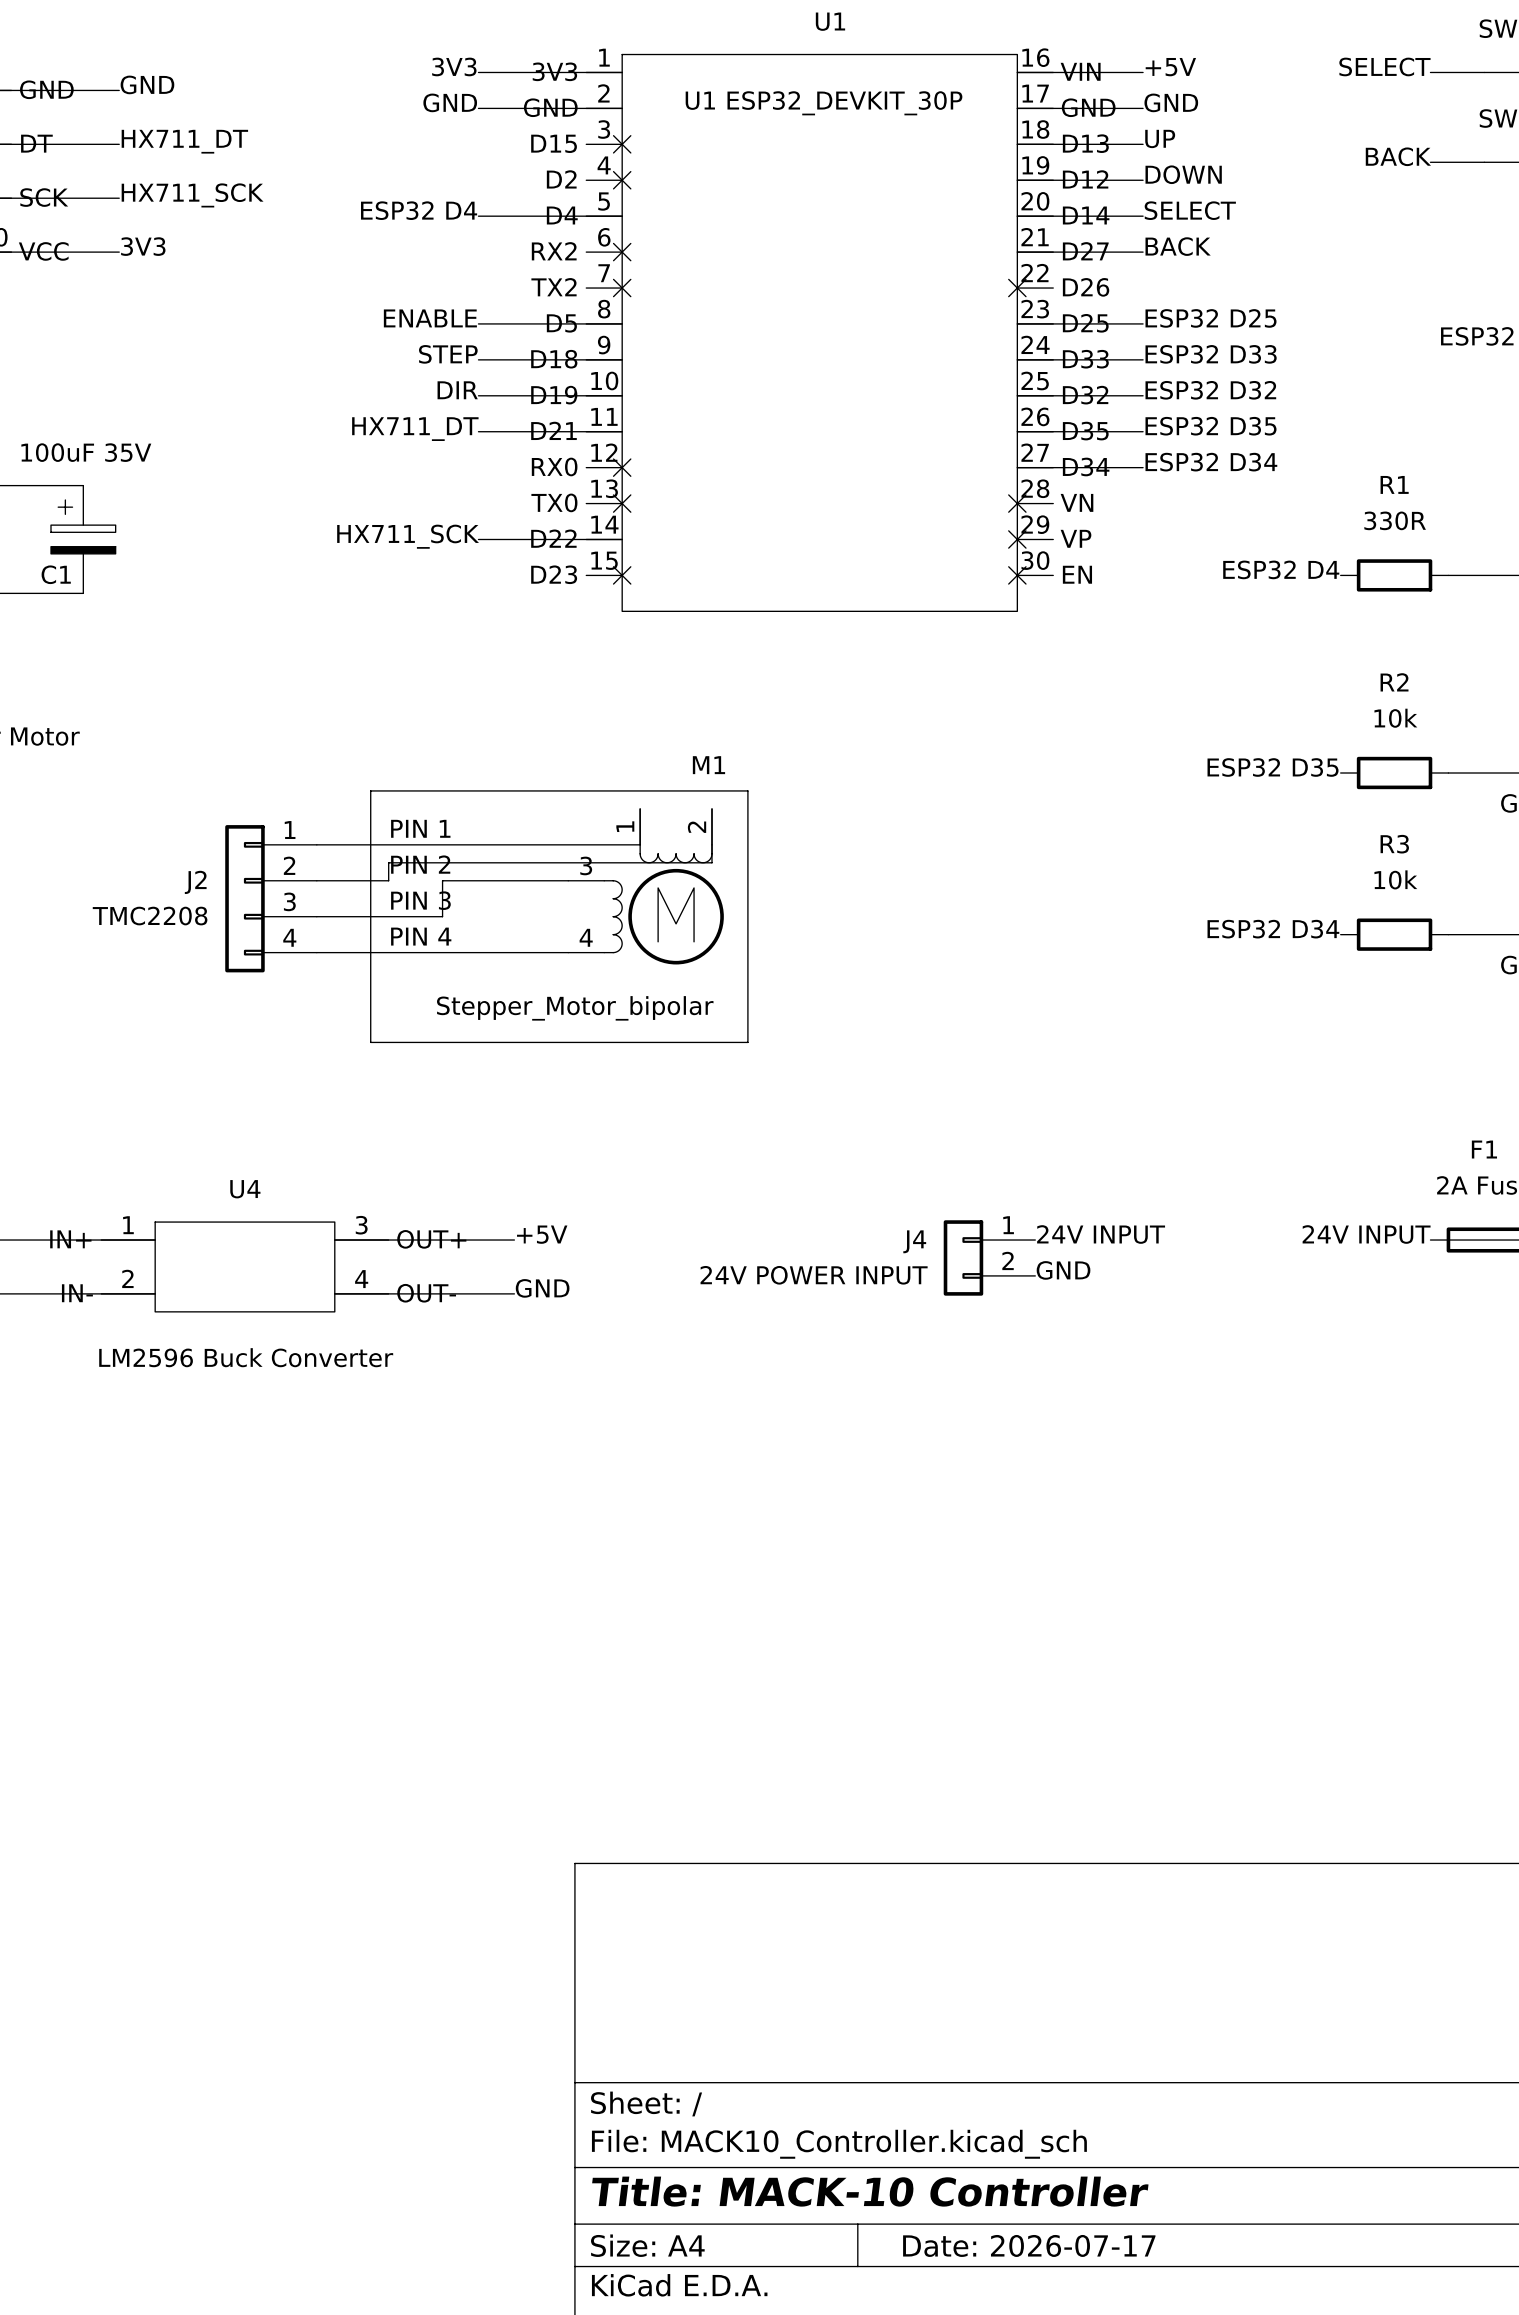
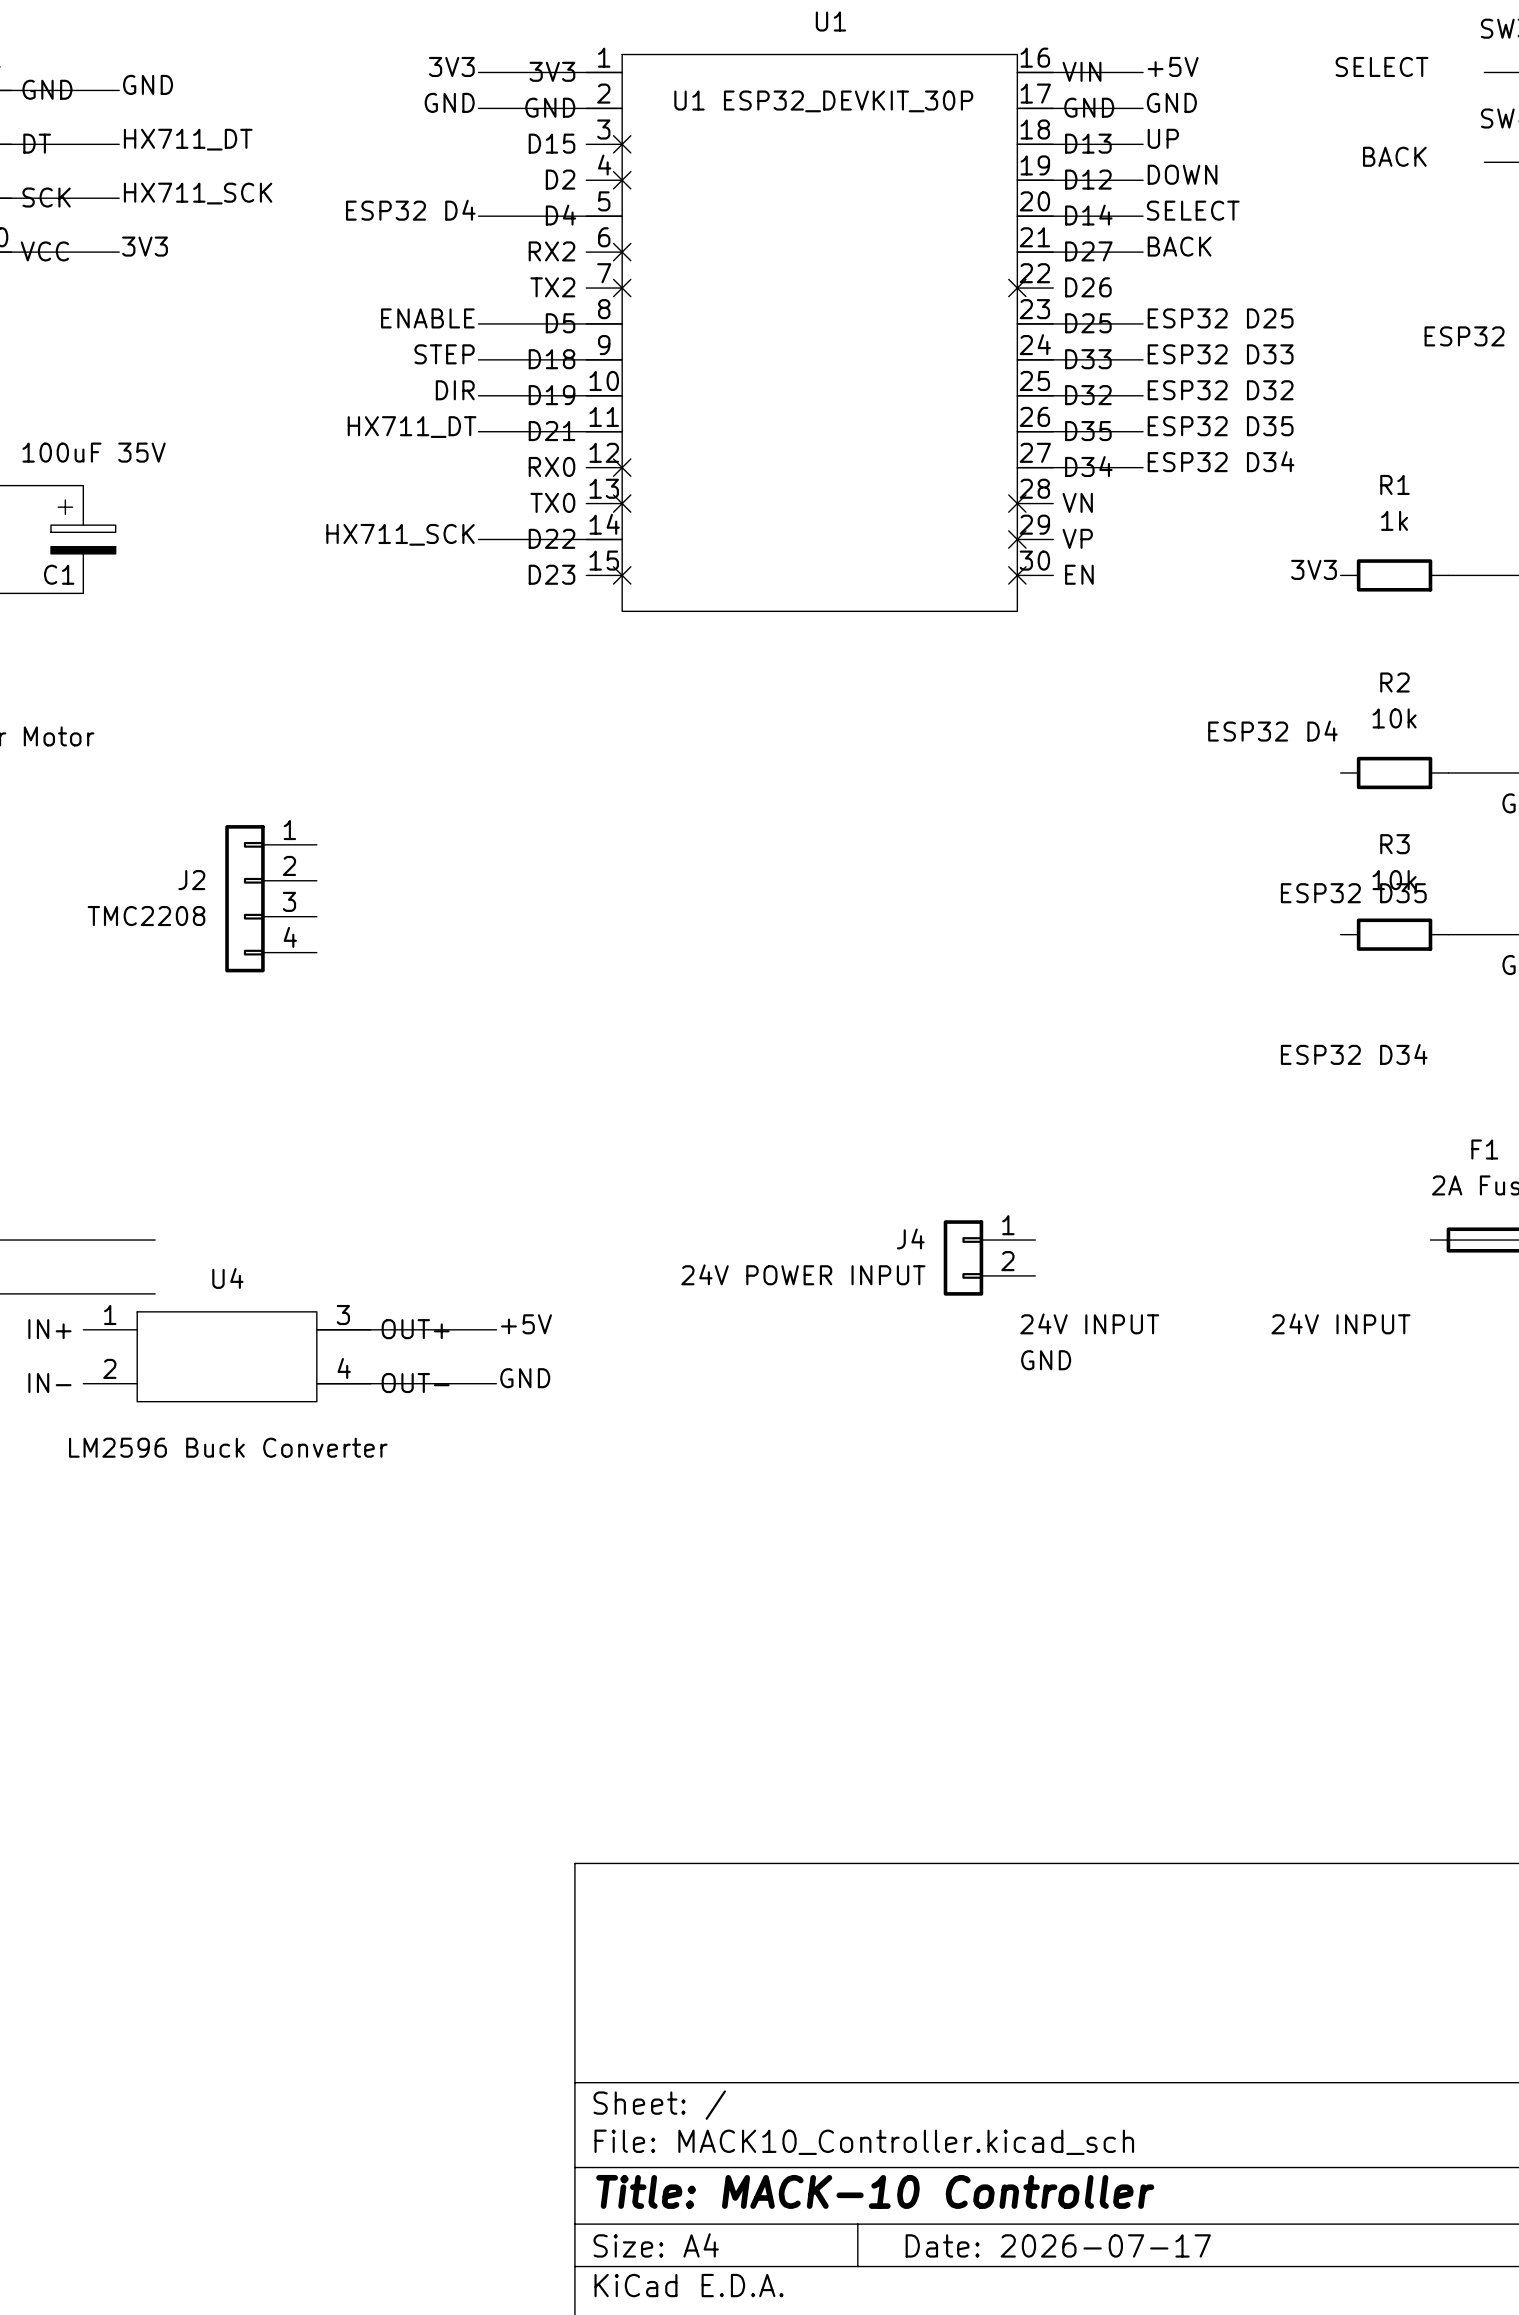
wire: (1430, 72) (1484, 72) -> none
wire: (1430, 162) (1484, 162) -> none
R1 value: 330R (1395, 520) -> 1k (1394, 520)
label: ESP32 D4 (1281, 569) -> 3V3 (1314, 569)
label: none -> ESP32 D4 (1272, 731)
label position: ESP32 D35 (1273, 767) -> ESP32 D35 (1353, 893)
line: (370, 790) (747, 790) (747, 1042) (370, 1042) (370, 790) -> none
wire: (640, 808) (640, 844) (316, 844) -> none
wire: (711, 808) (711, 862) (388, 862) (388, 880) (316, 880) -> none
label: PIN 1 (420, 828) -> none
label: PIN 2 (420, 864) -> none
wire: (568, 880) (442, 880) (442, 916) (316, 916) -> none
M1: Stepper_Motor_bipolar (646, 886) -> none
label: PIN 3 (420, 900) -> none
label position: ESP32 D34 (1273, 929) -> ESP32 D34 (1354, 1054)
label: PIN 4 (421, 936) -> none
wire: (316, 952) (568, 952) -> none
label position: +5V (542, 1234) -> +5V (526, 1324)
label position: 24V INPUT (1101, 1234) -> 24V INPUT (1089, 1323)
label position: 24V INPUT (1366, 1234) -> 24V INPUT (1340, 1323)
wire: (334, 1240) (514, 1240) -> (316, 1329) (496, 1329)
U4 position: (244, 1266) -> (227, 1356)
label position: GND (1063, 1270) -> GND (1046, 1360)
label position: GND (542, 1288) -> GND (525, 1378)
wire: (334, 1293) (514, 1293) -> (316, 1383) (496, 1383)

